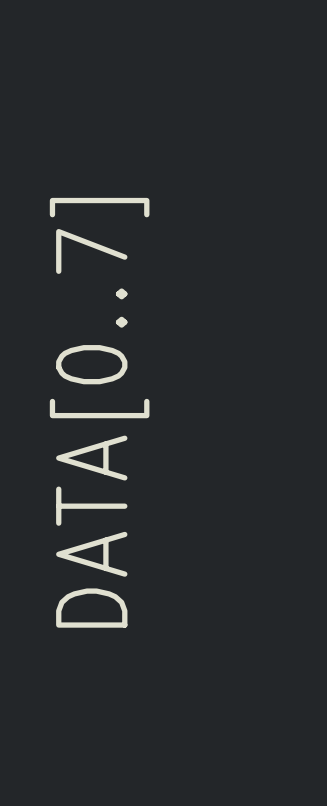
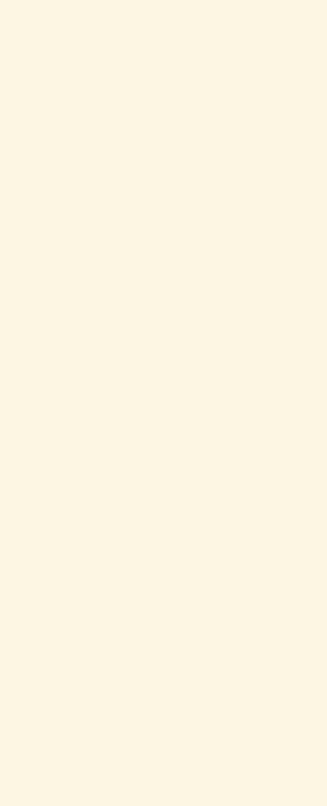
label: DATA[0..7] (99, 412) -> none

